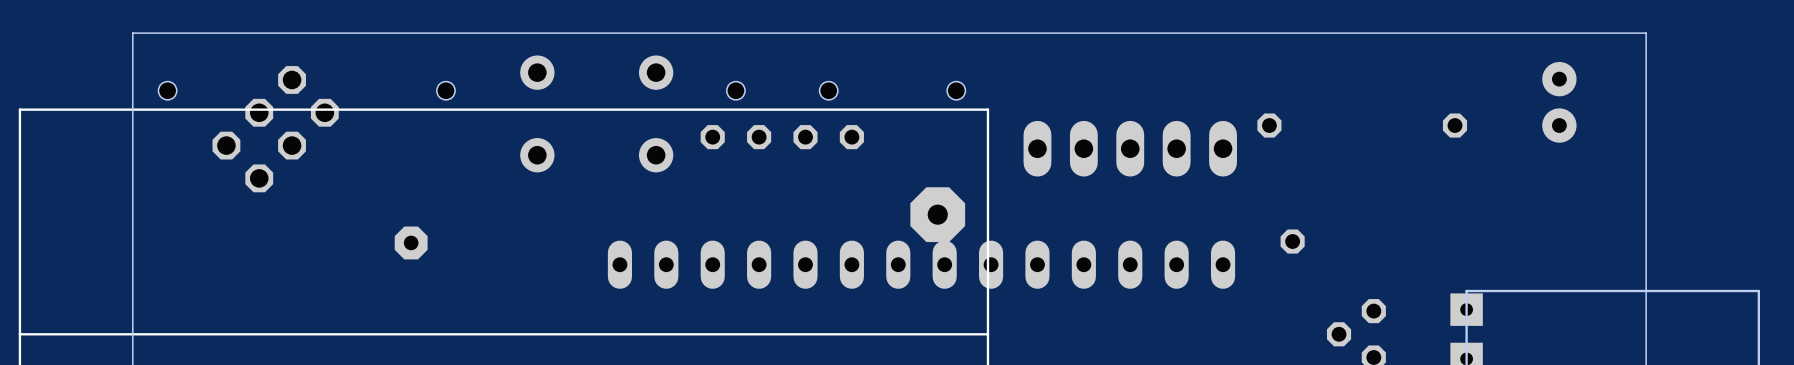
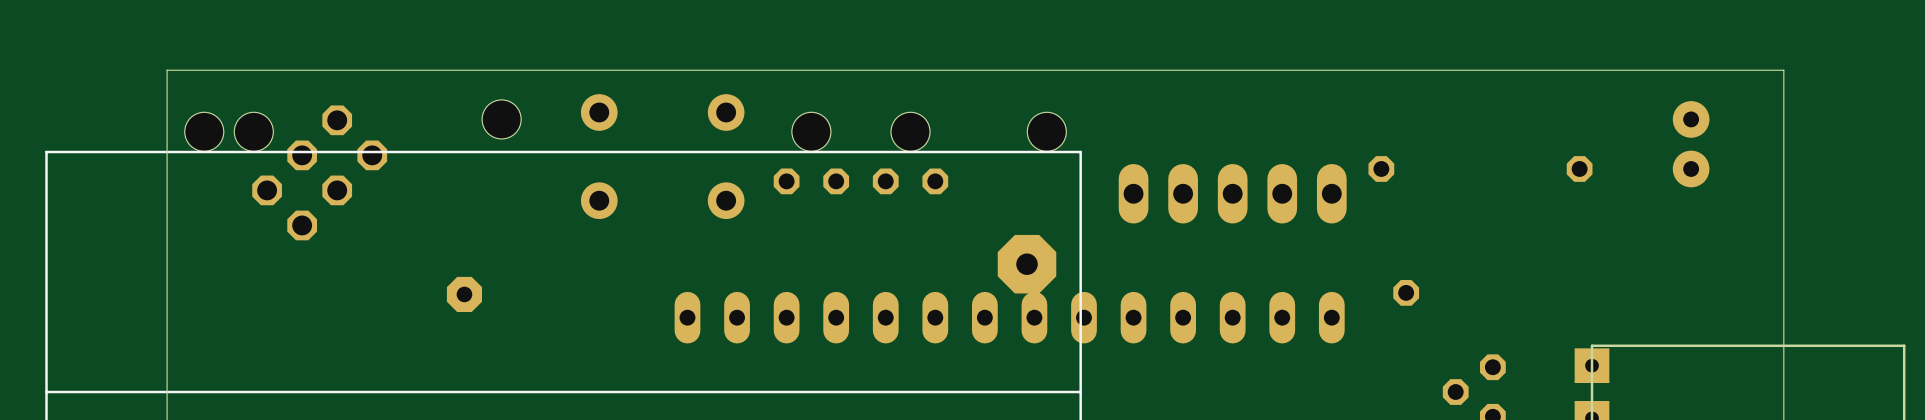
hole size: [158, 81, 177, 100] -> [184, 112, 224, 152]
hole size: [436, 81, 456, 100] -> [482, 99, 522, 139]
hole size: [726, 81, 746, 100] -> [791, 112, 831, 152]
hole size: [819, 81, 838, 100] -> [891, 112, 931, 152]
hole size: [947, 81, 966, 100] -> [1027, 112, 1067, 152]
hole: none -> (253, 131)

